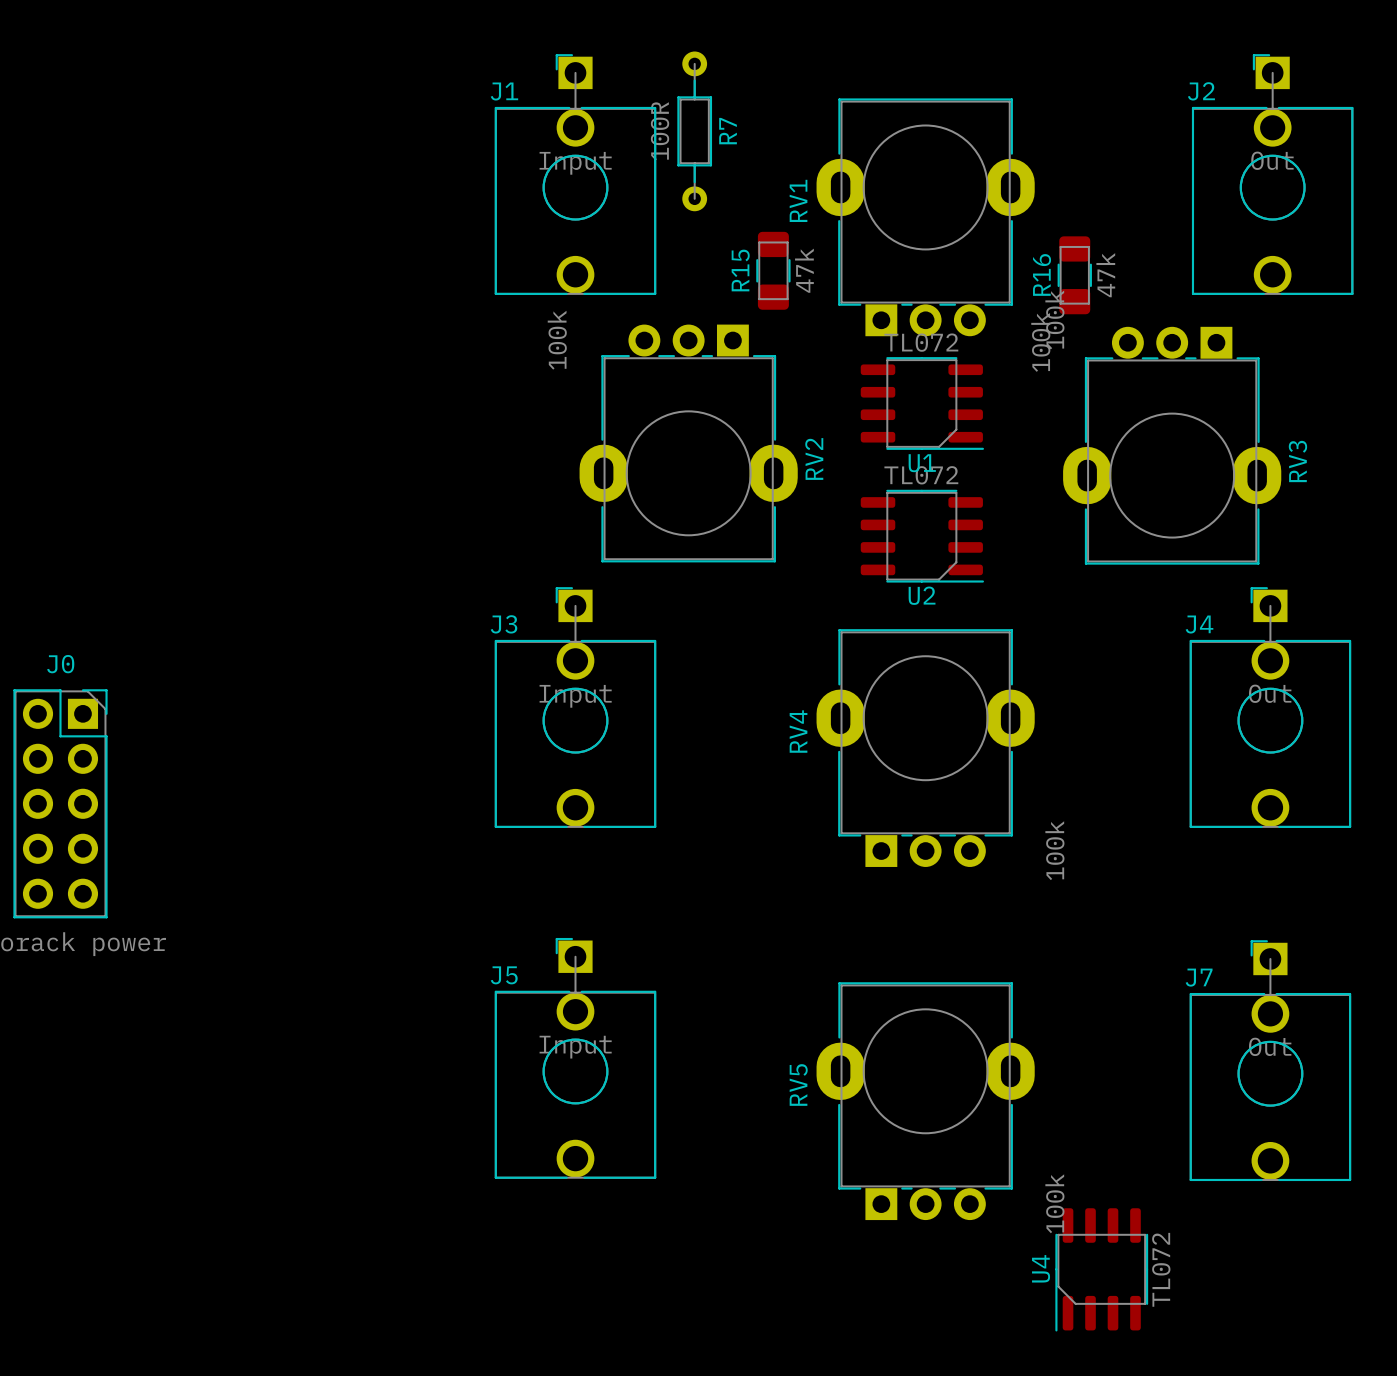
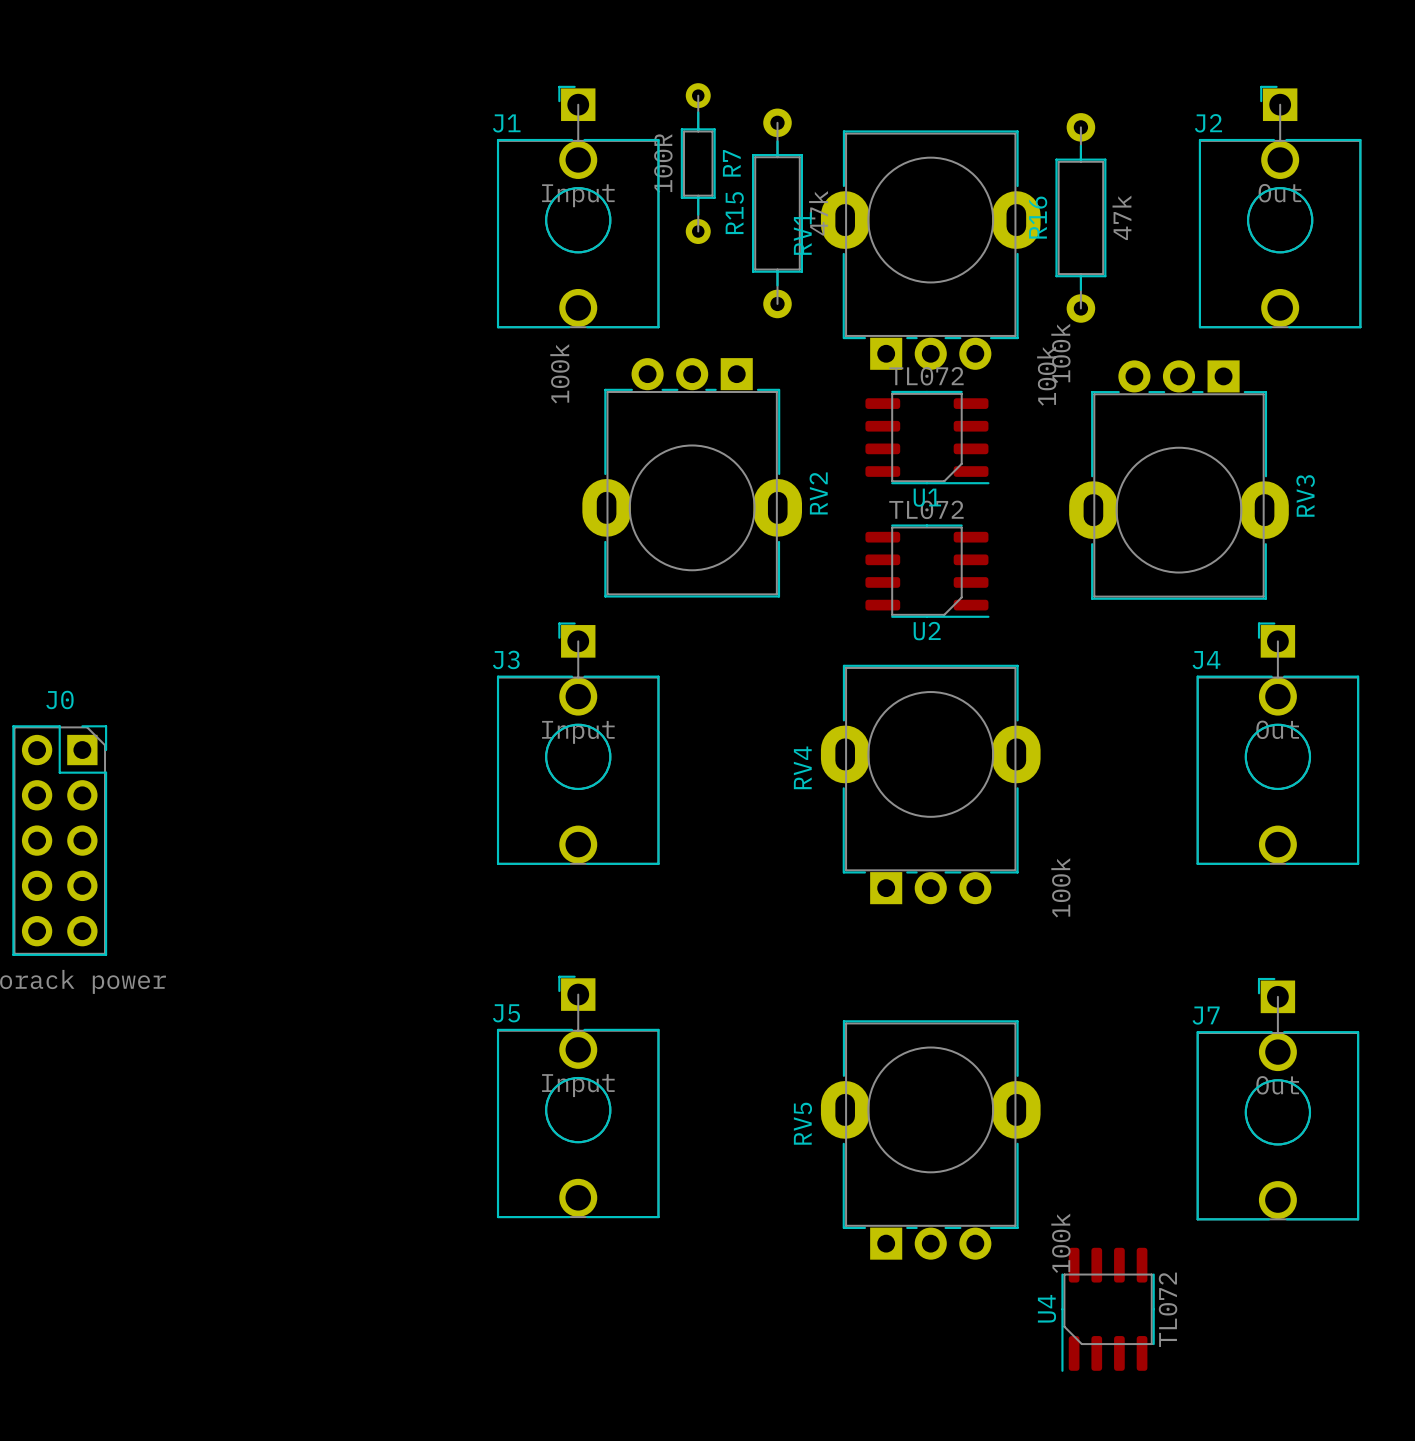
R15 footprint: [756, 231, 791, 310] -> [752, 108, 804, 319]
R16 footprint: [1057, 236, 1092, 315] -> [1055, 113, 1107, 323]

